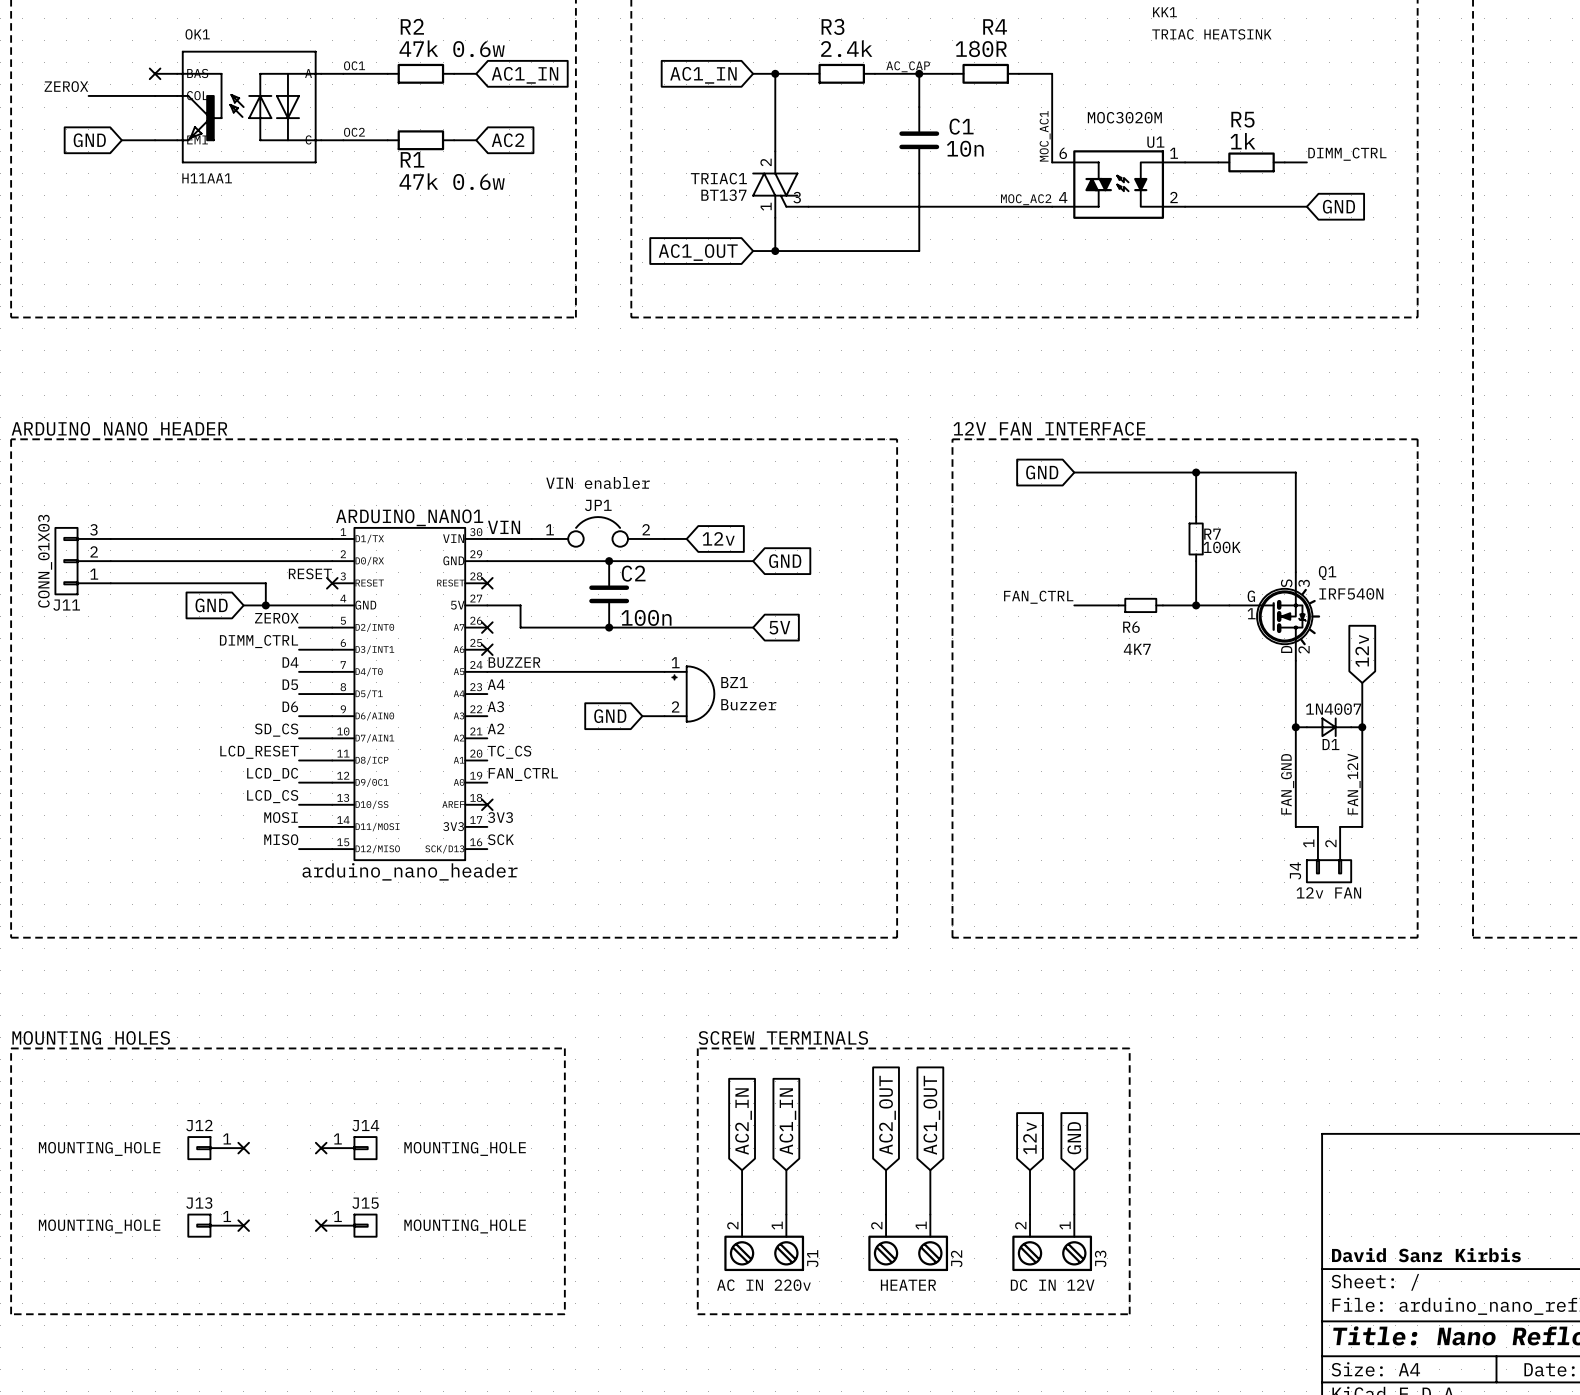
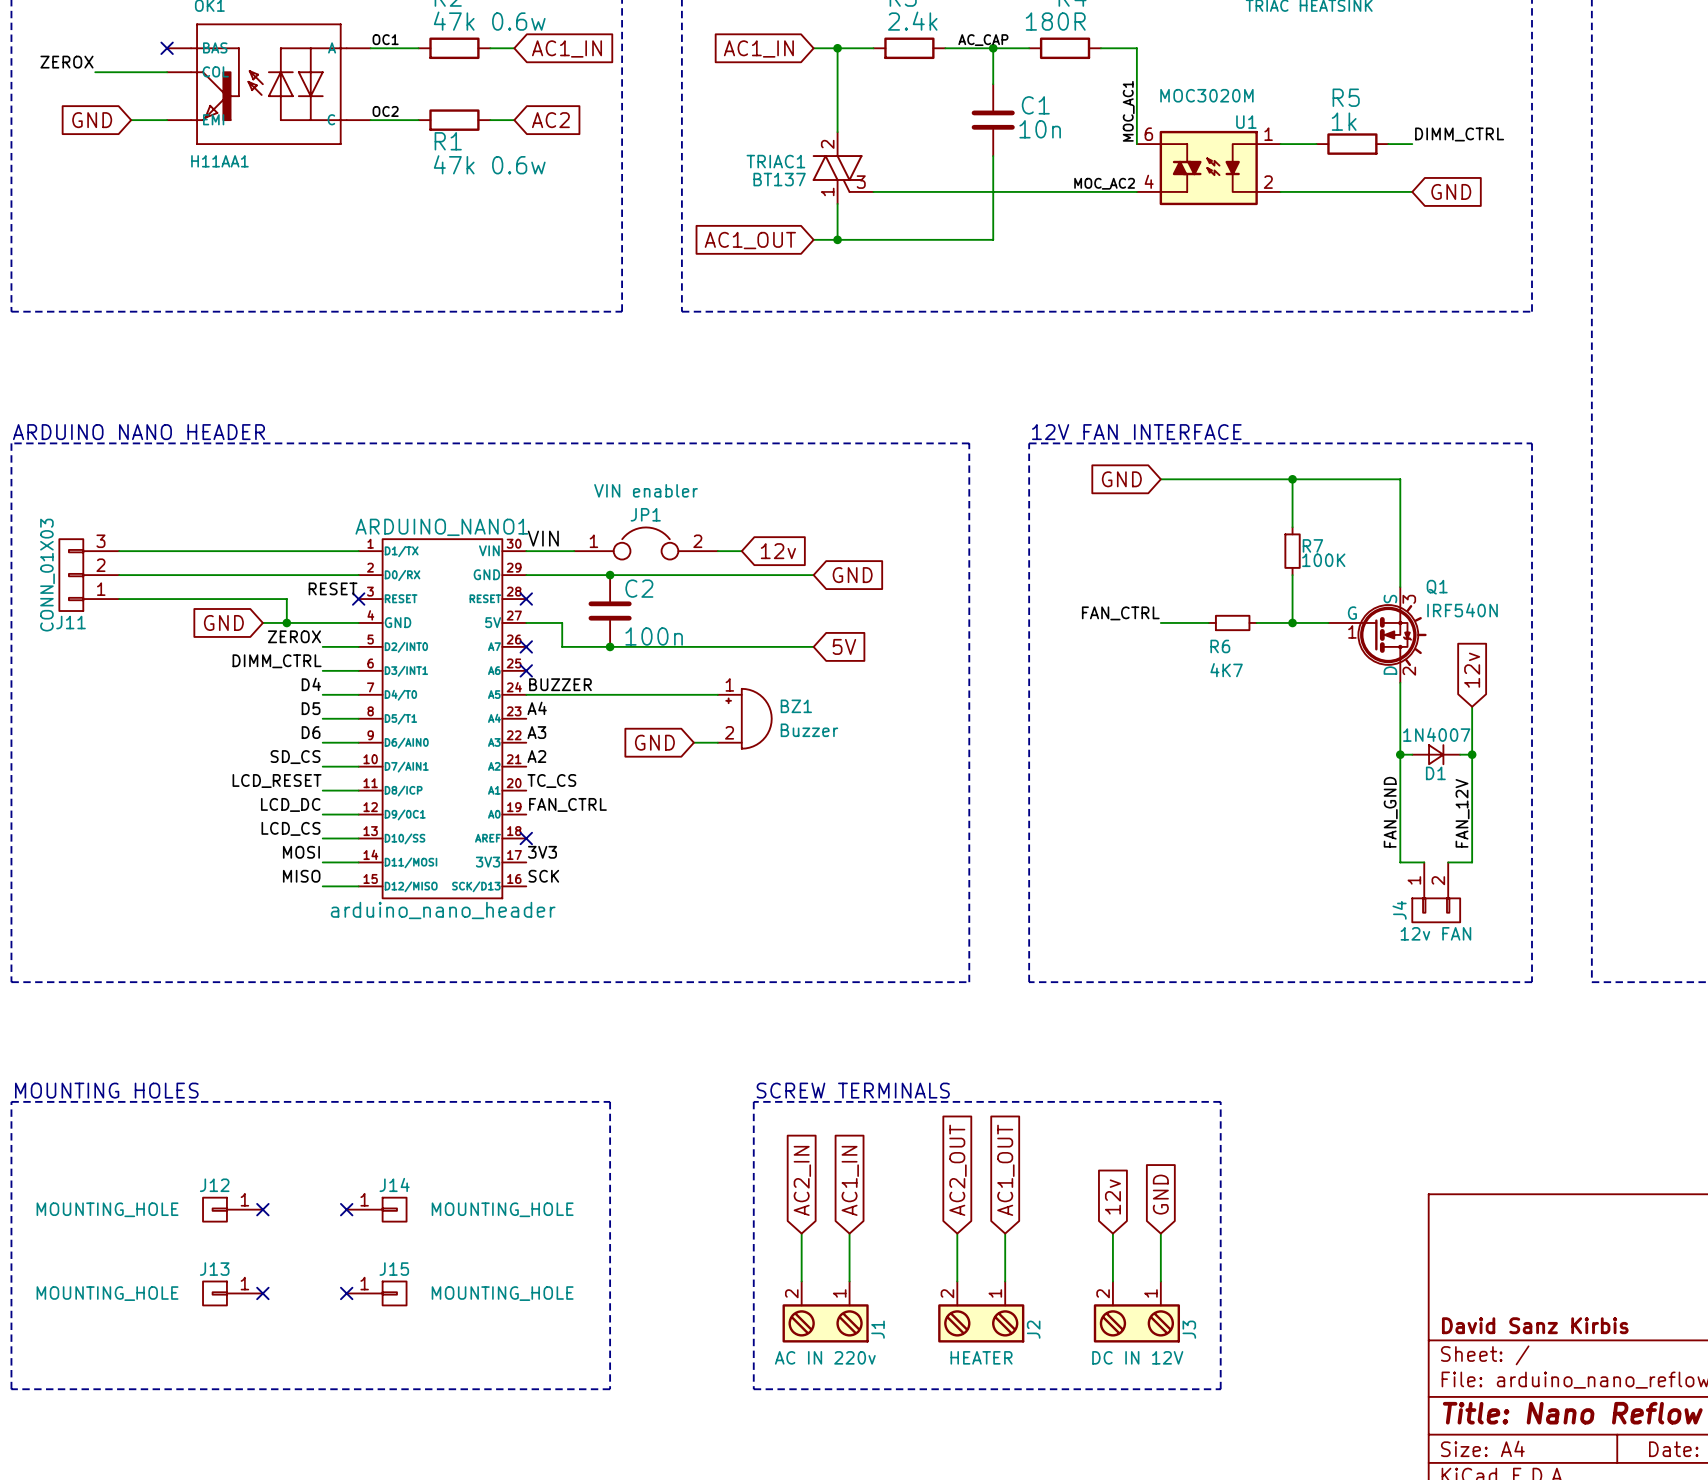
junction: none -> (610, 575)
junction: (609, 561) -> none
C2 position: (609, 594) -> (610, 611)
junction: none -> (610, 646)
junction: (609, 627) -> none

